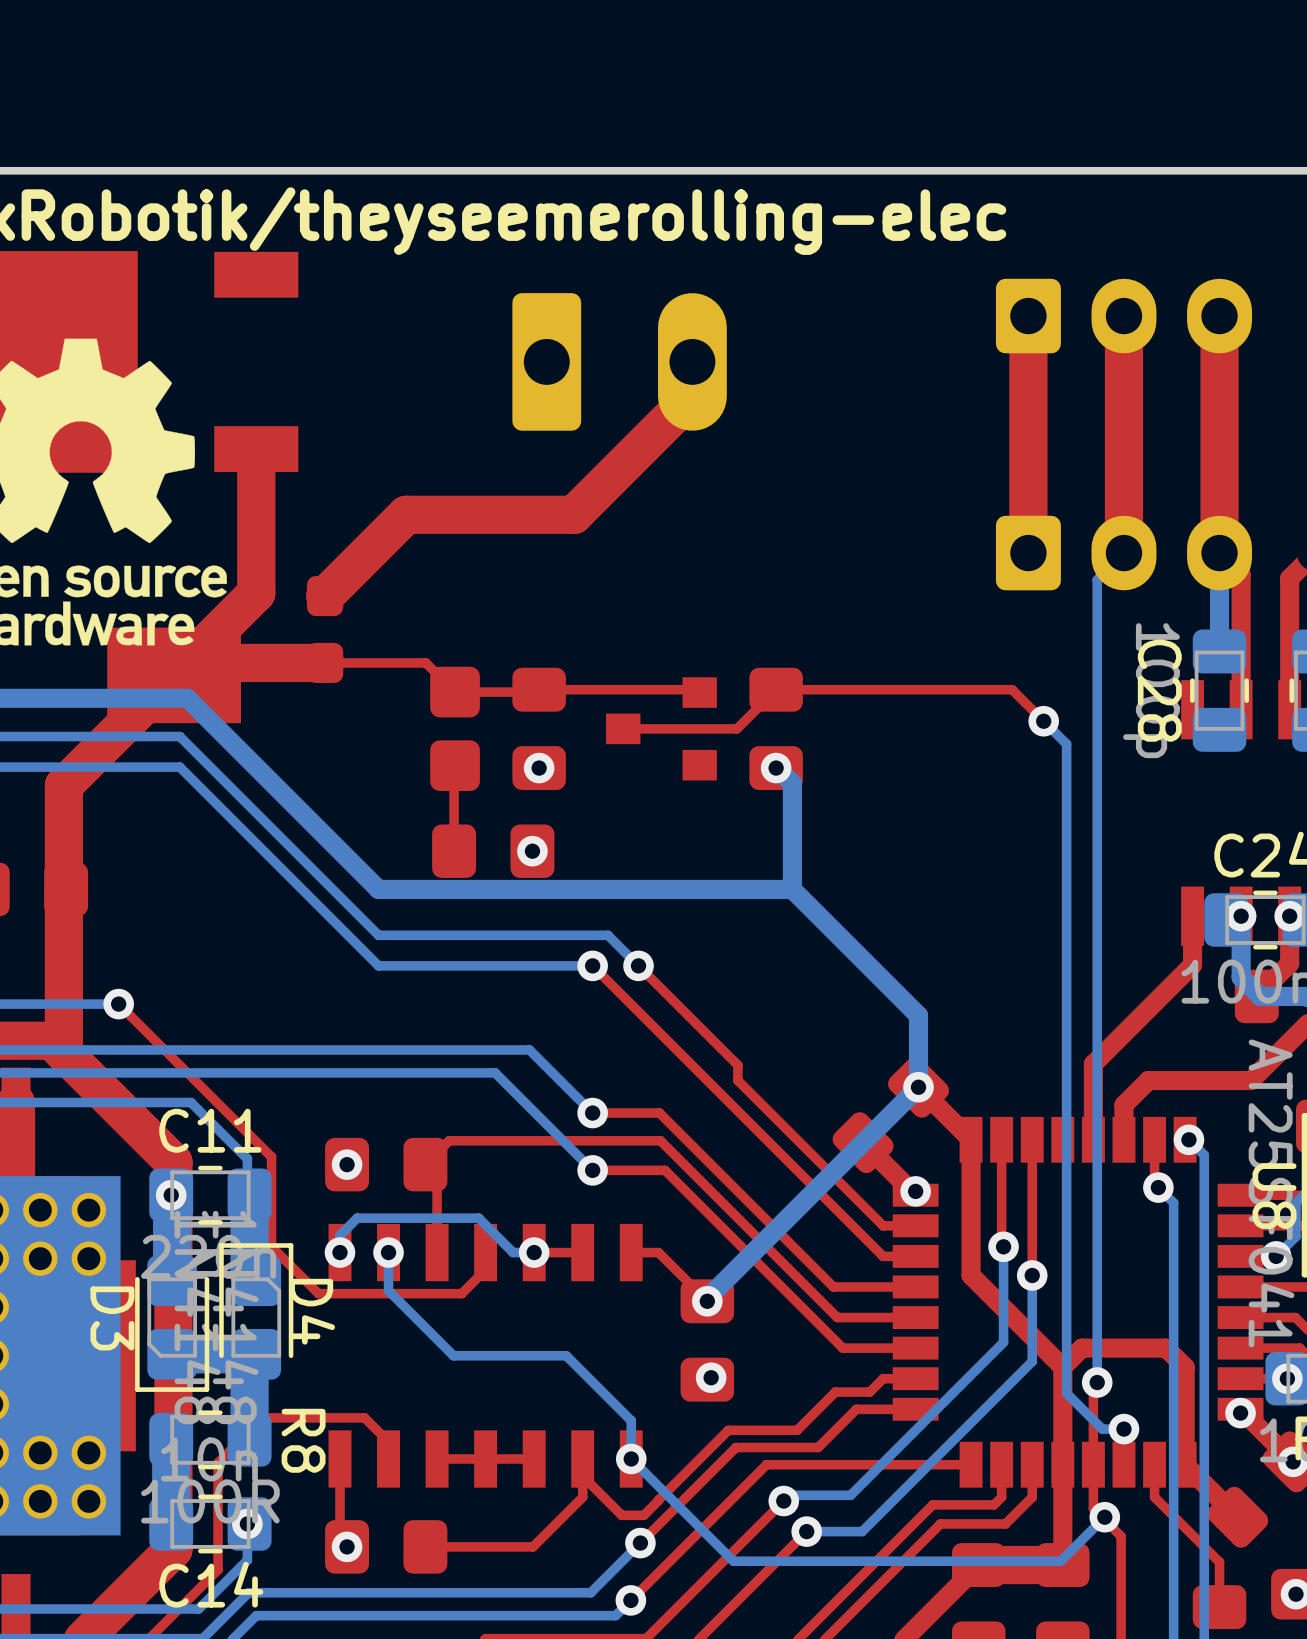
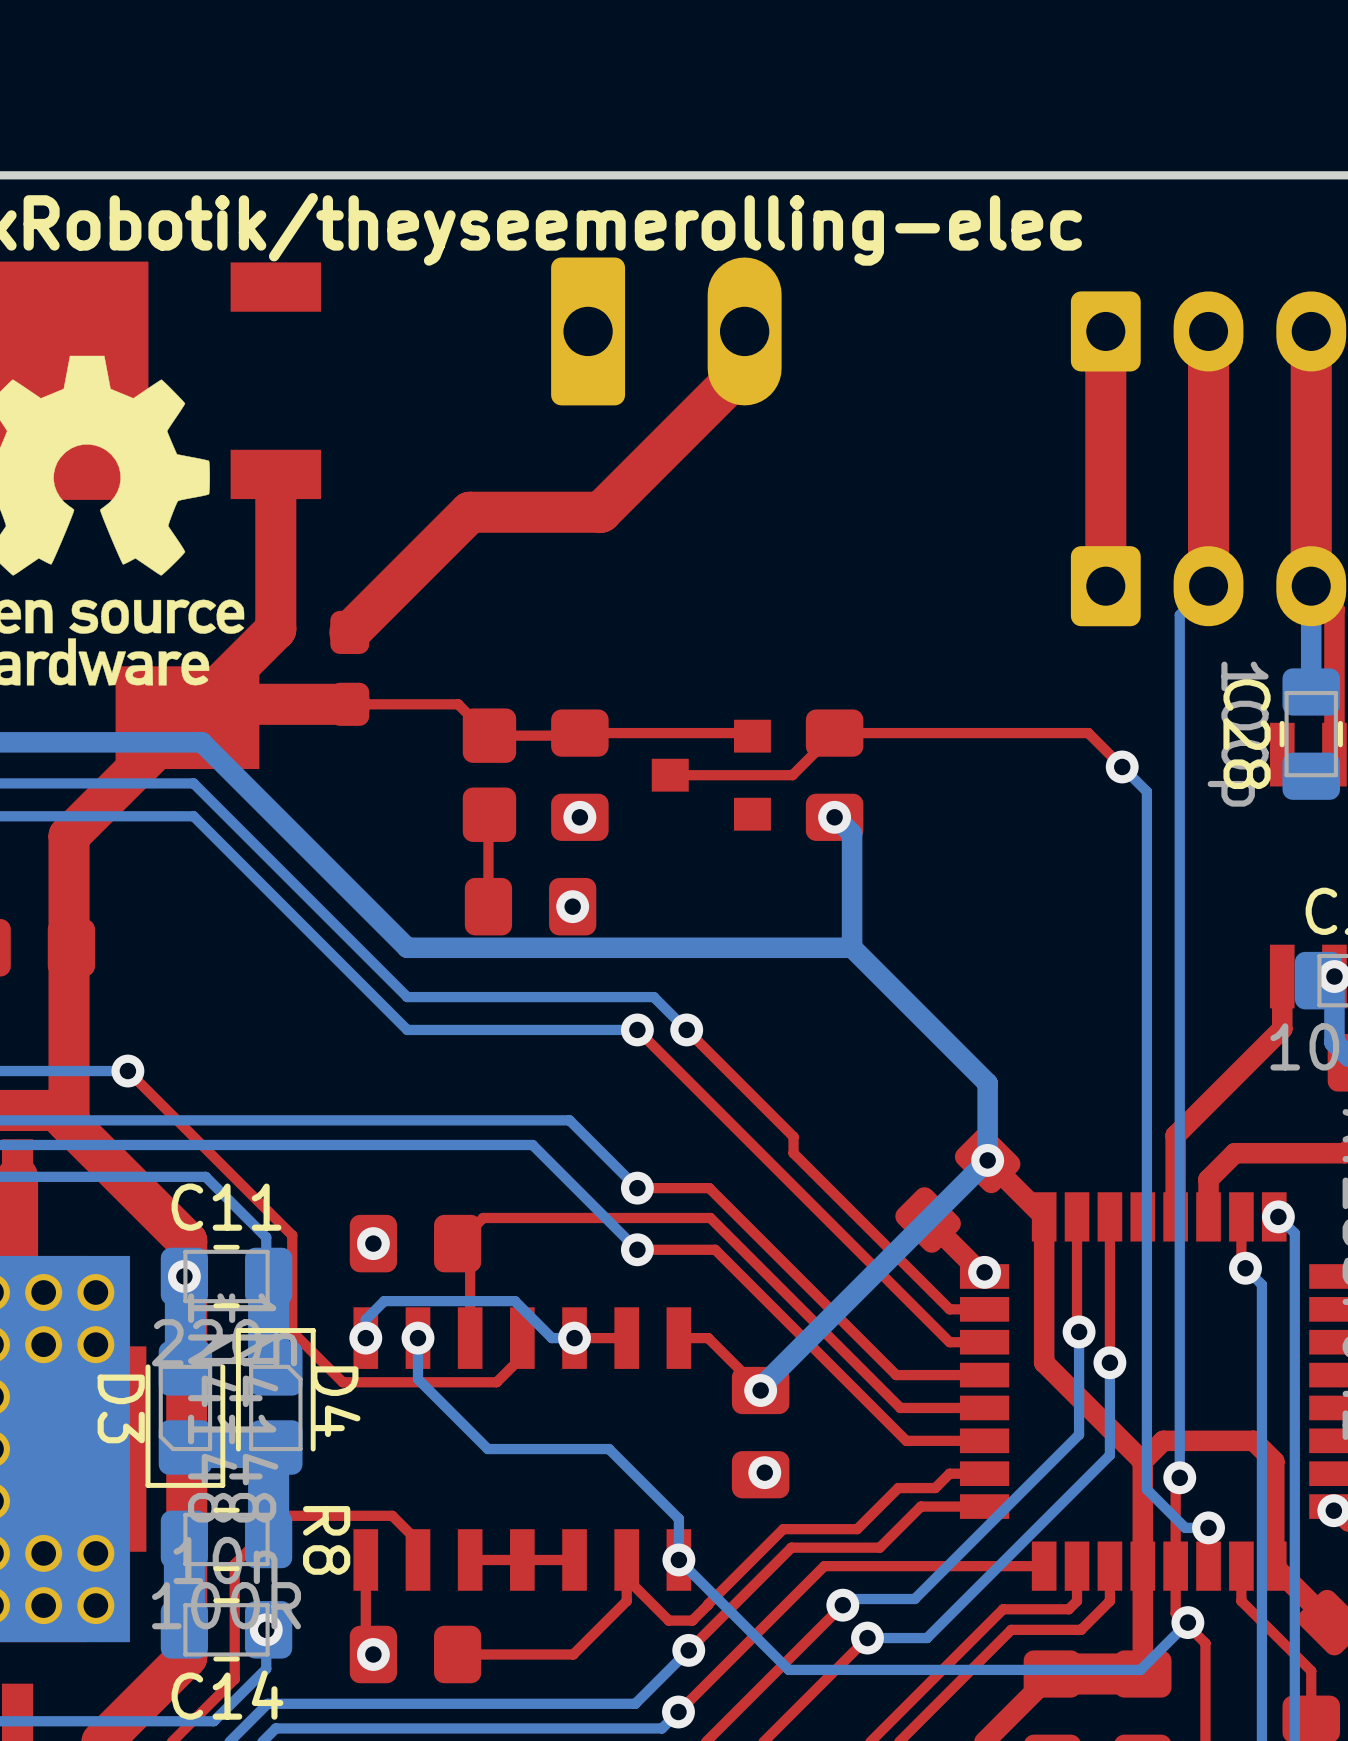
part position: (619, 361) -> (666, 331)
top track: (692, 361) (692, 396) (573, 514) (406, 514) -> (744, 368) (600, 512) (469, 512) (437, 545)

